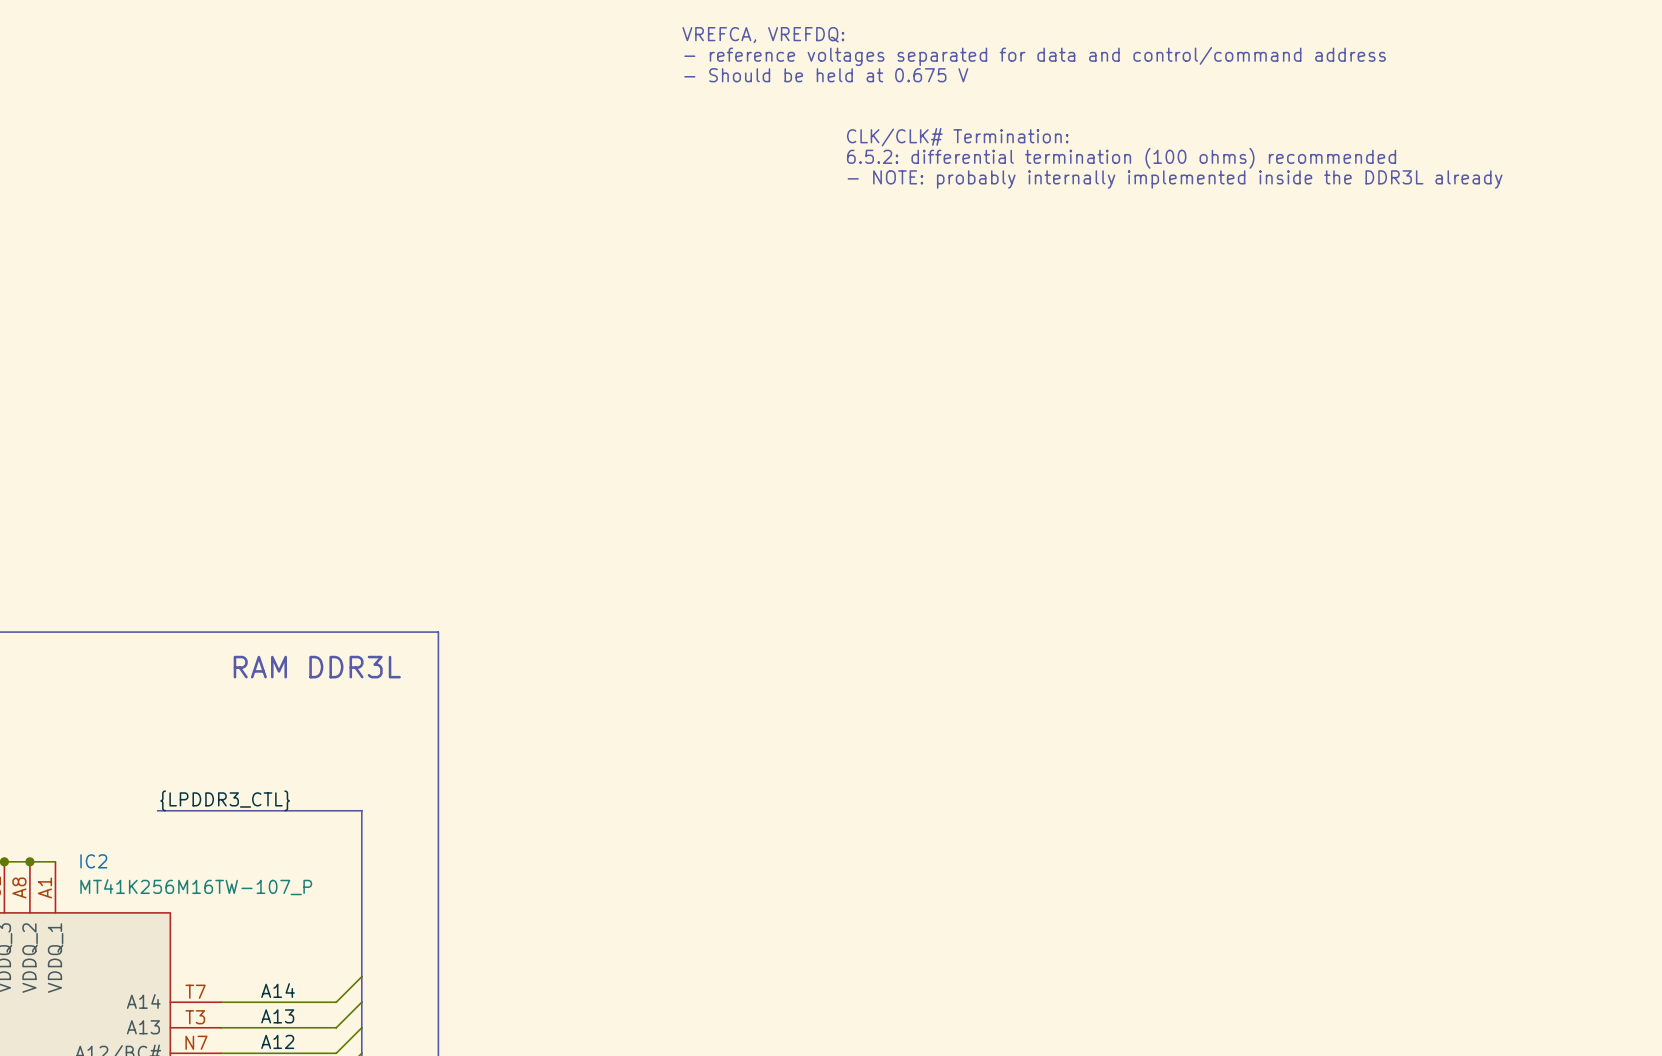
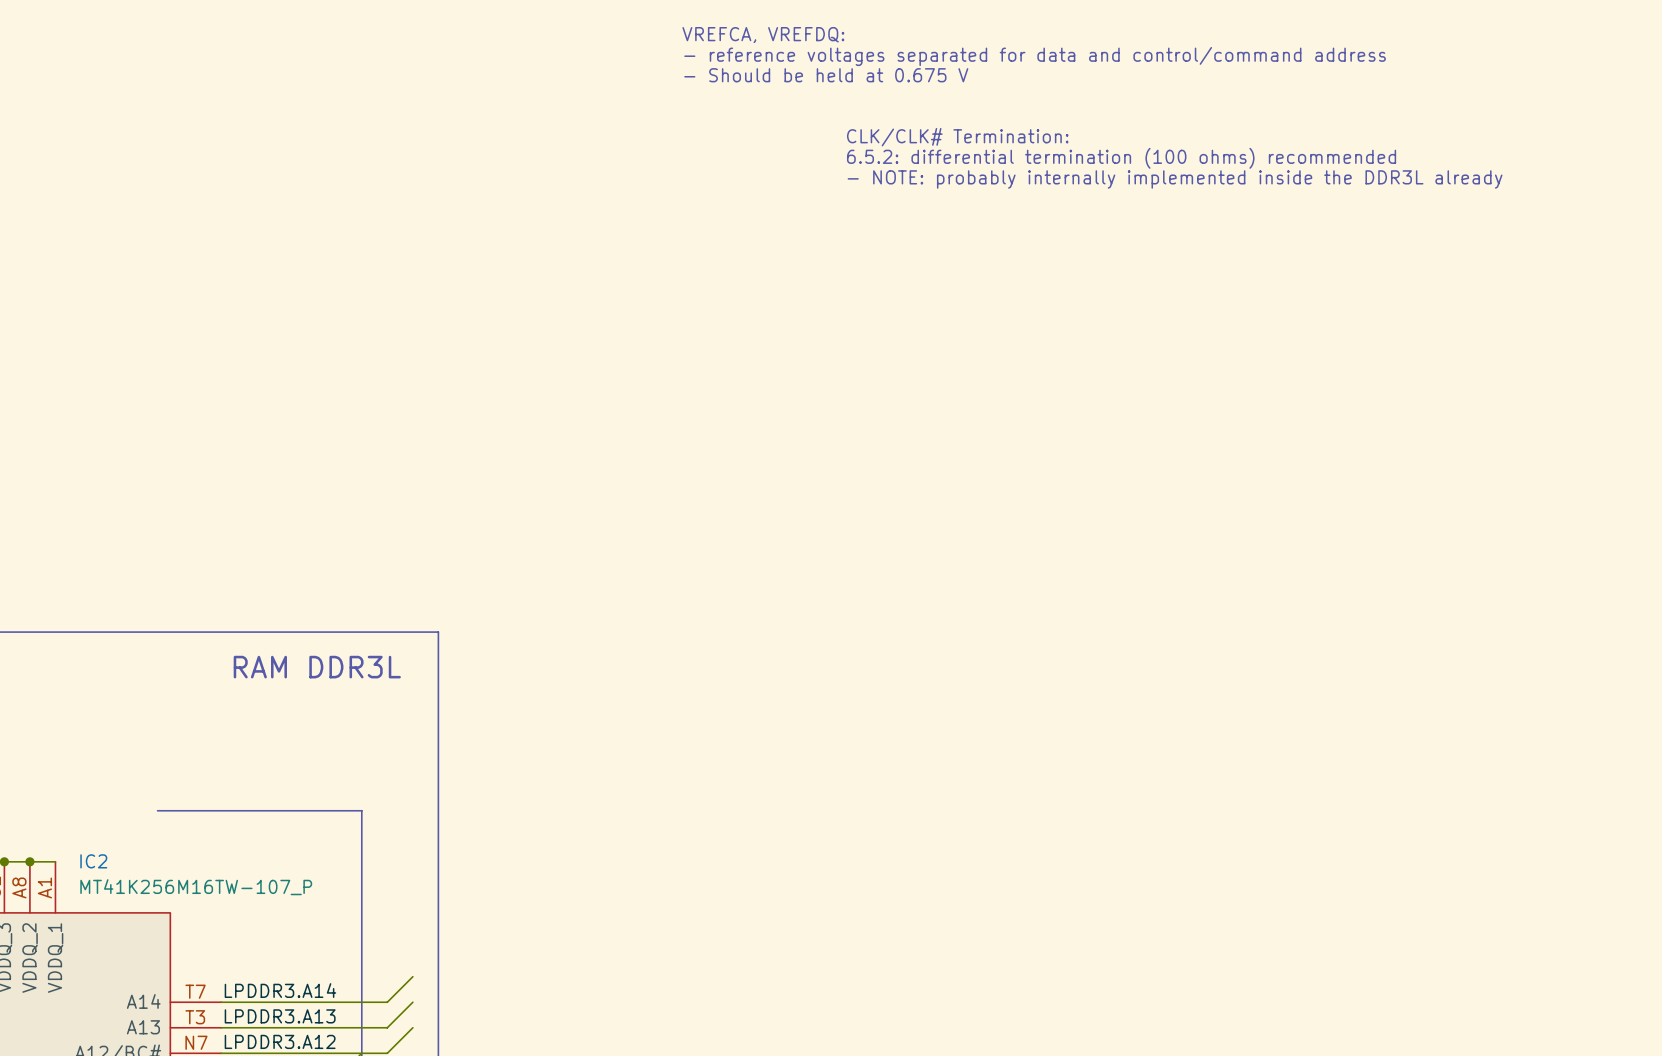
label: {LPDDR3_CTL} (225, 800) -> none
wire: (361, 976) (336, 1002) -> (412, 976) (387, 1002) (336, 1002)
label: A14 (278, 990) -> none
label: none -> LPDDR3.A14 (280, 990)
wire: (361, 1002) (336, 1027) -> (412, 1002) (387, 1027) (336, 1027)
label: A13 (277, 1016) -> none
label: none -> LPDDR3.A13 (280, 1016)
wire: (361, 1027) (336, 1053) -> (412, 1027) (387, 1053) (336, 1053)
label: A12 (277, 1041) -> none
label: none -> LPDDR3.A12 (280, 1041)

